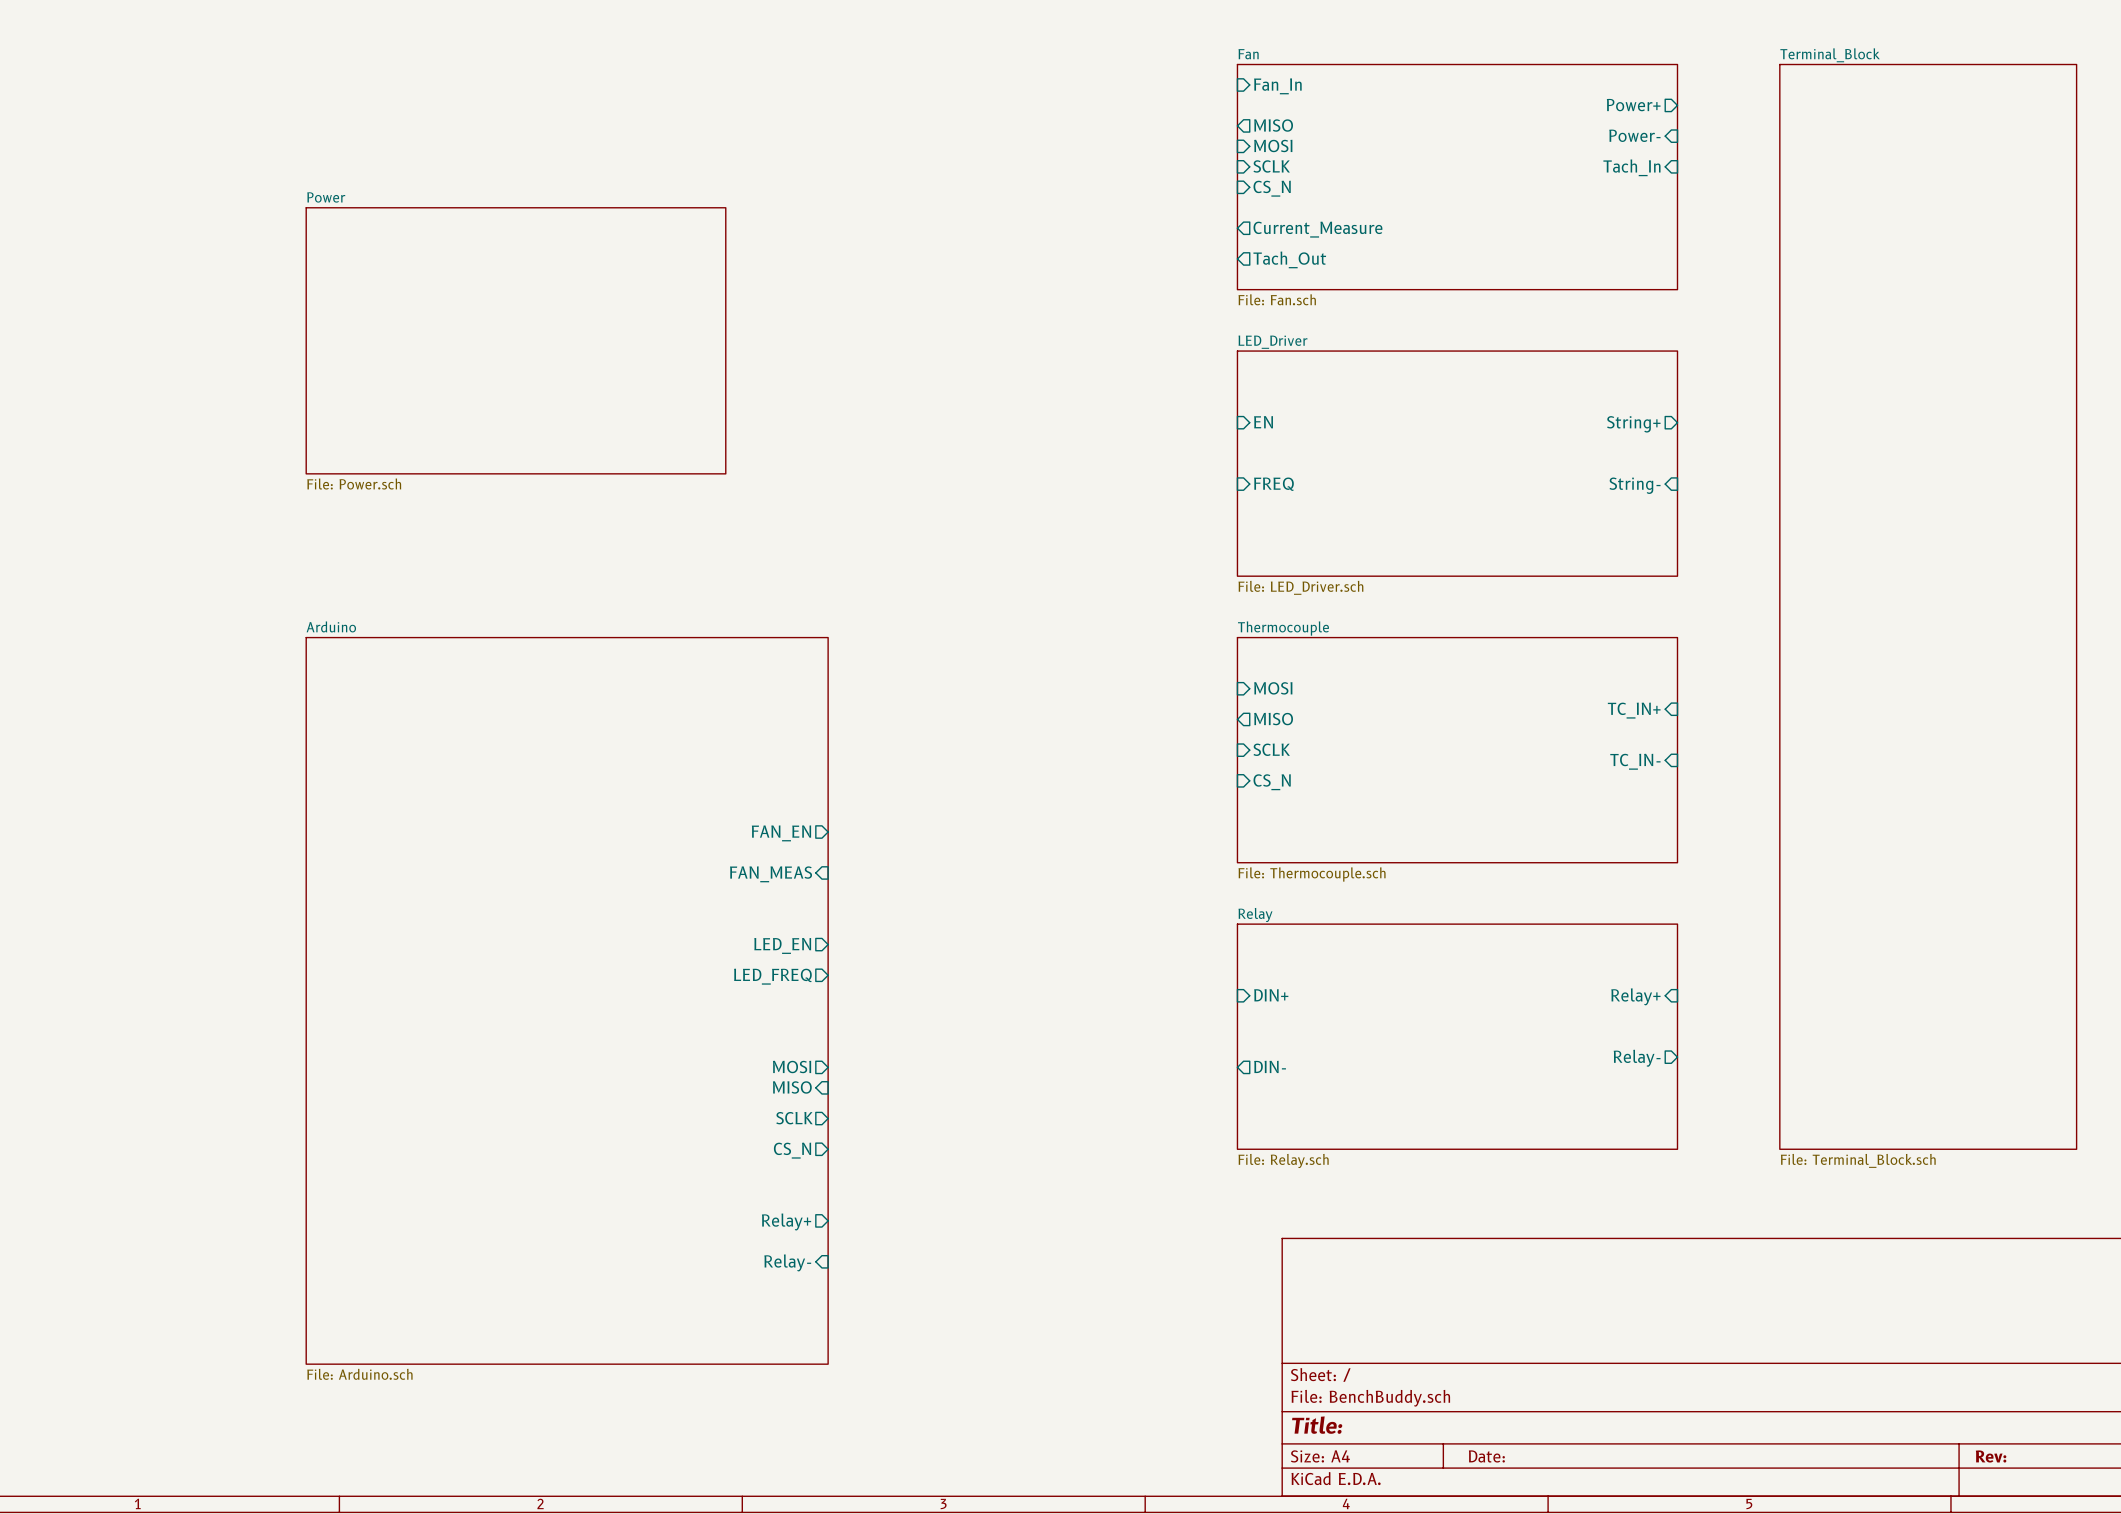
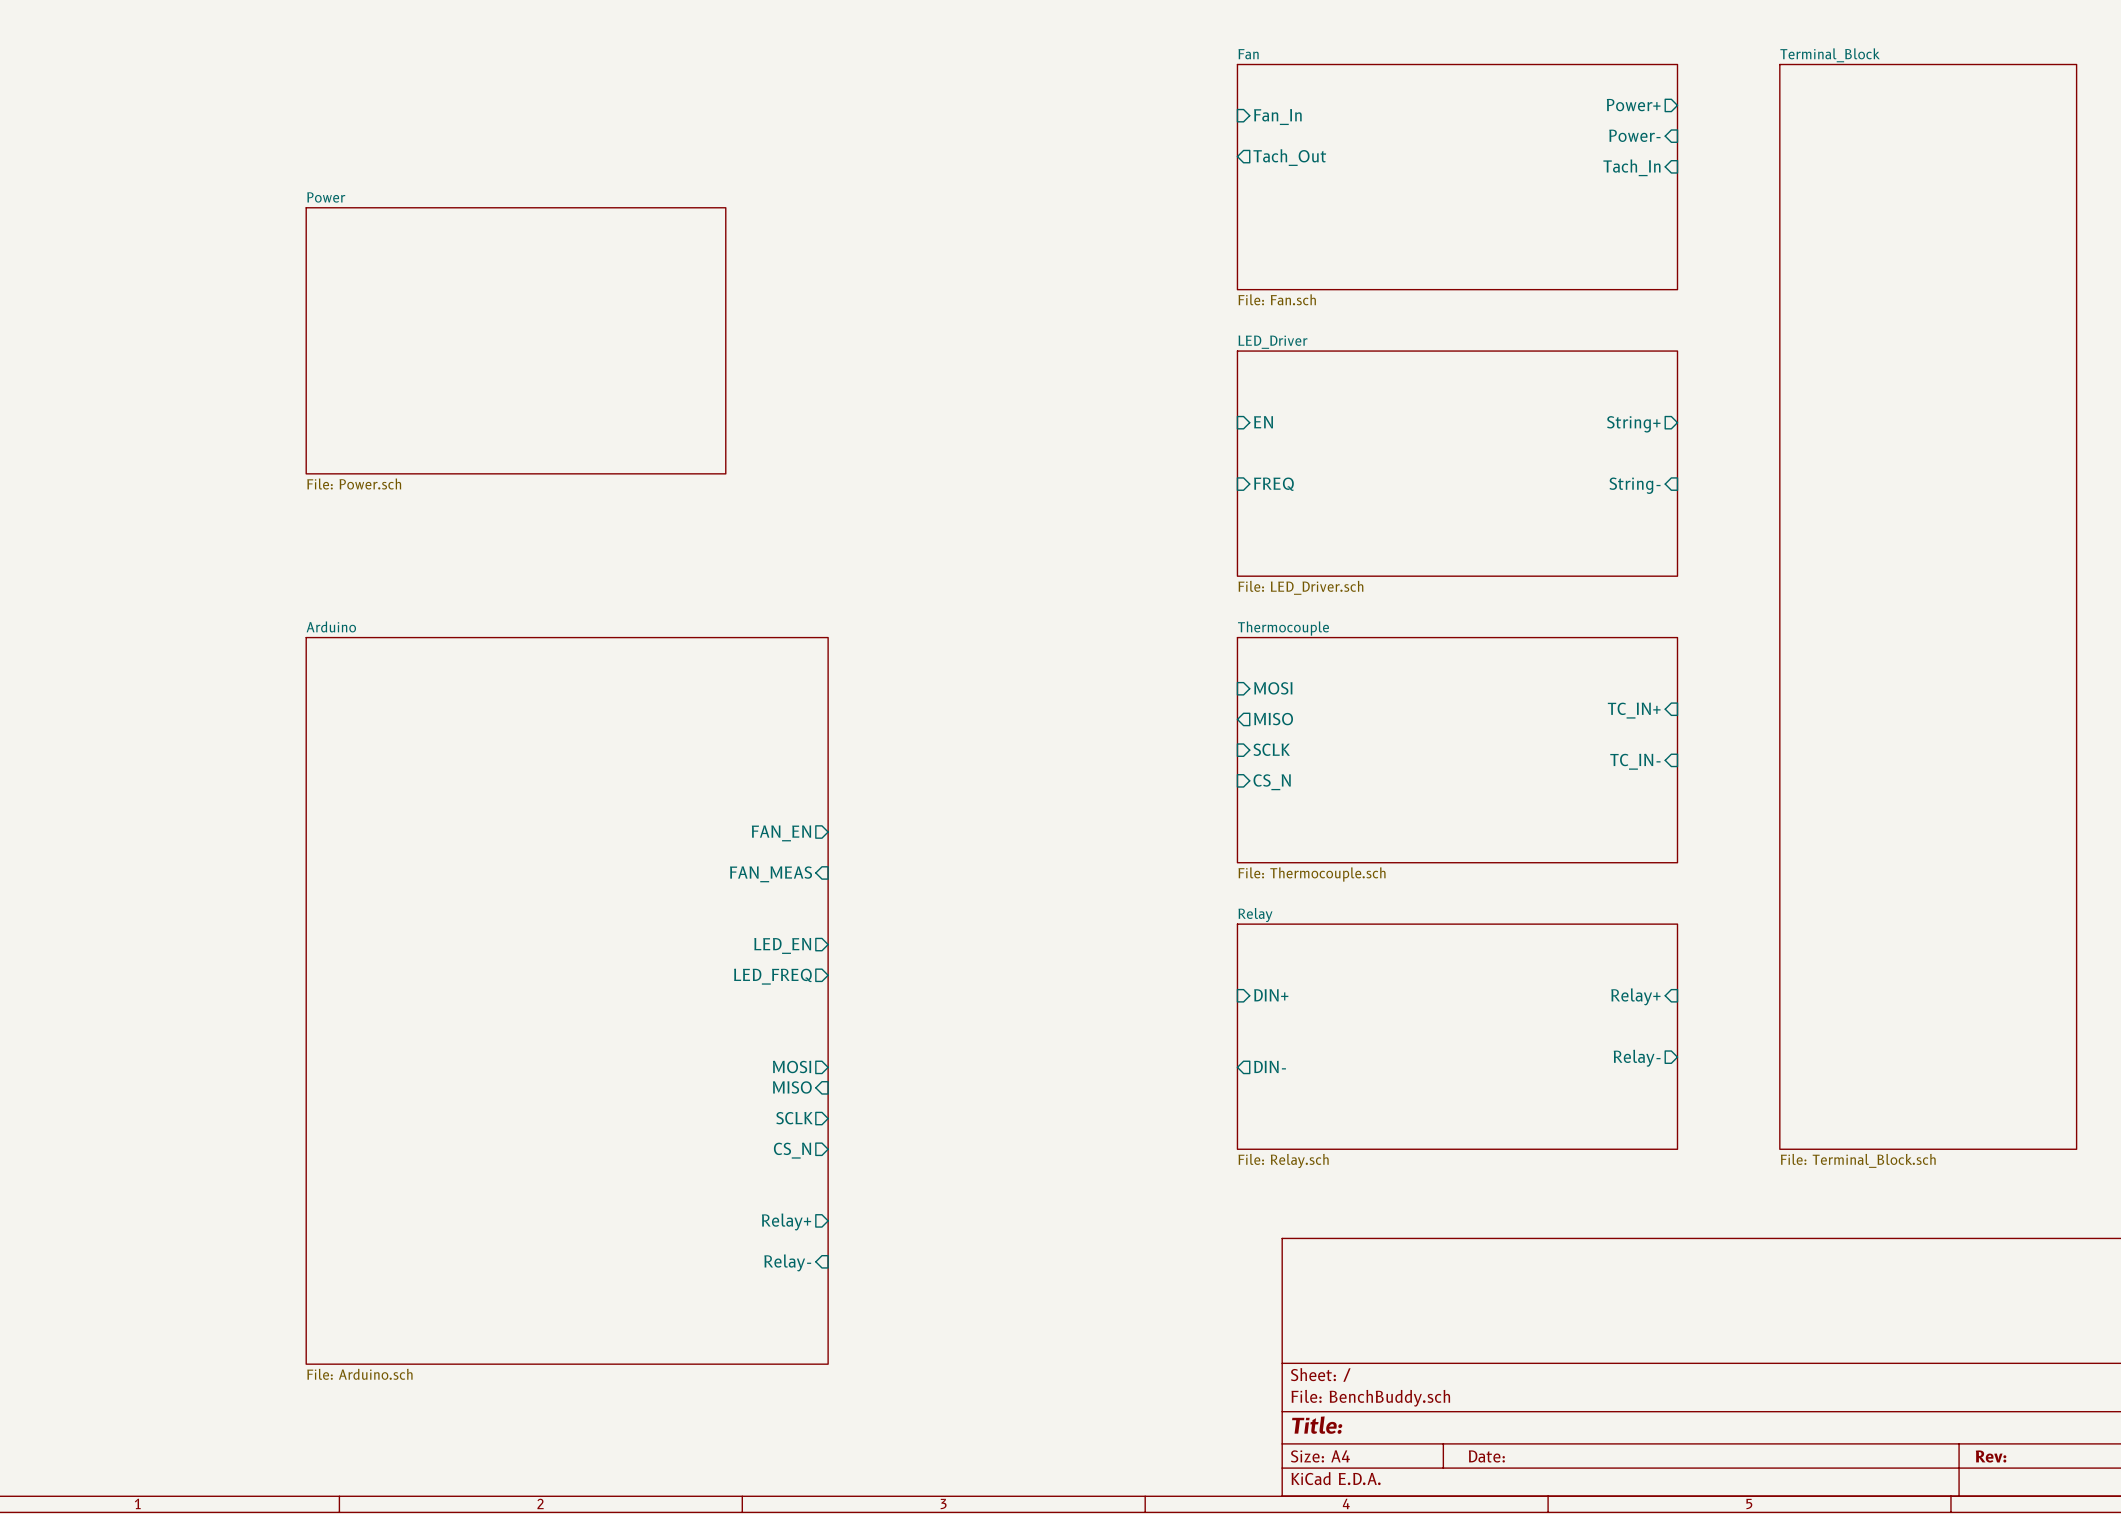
sheet pin position: Fan_In (1277, 86) -> Fan_In (1277, 117)
sheet pin: MISO (1273, 125) -> none
sheet pin: MOSI (1273, 145) -> none
sheet pin: SCLK (1271, 166) -> none
sheet pin: CS_N (1272, 188) -> none
sheet pin: Current_Measure (1317, 229) -> none
sheet pin position: Tach_Out (1289, 259) -> Tach_Out (1289, 157)

